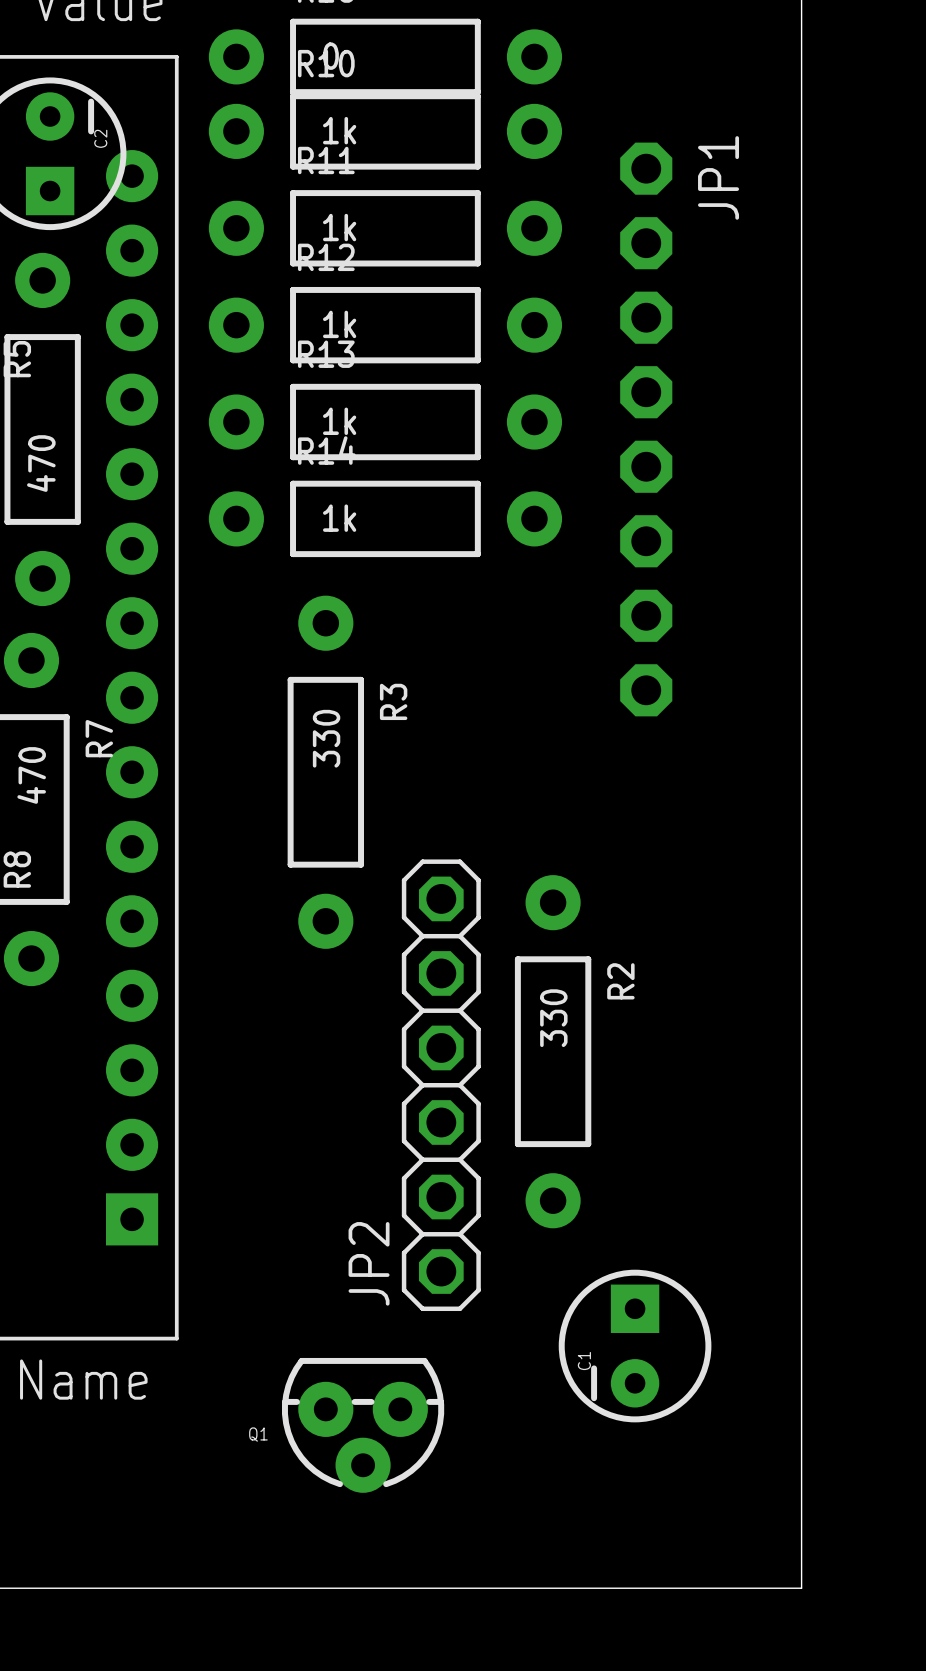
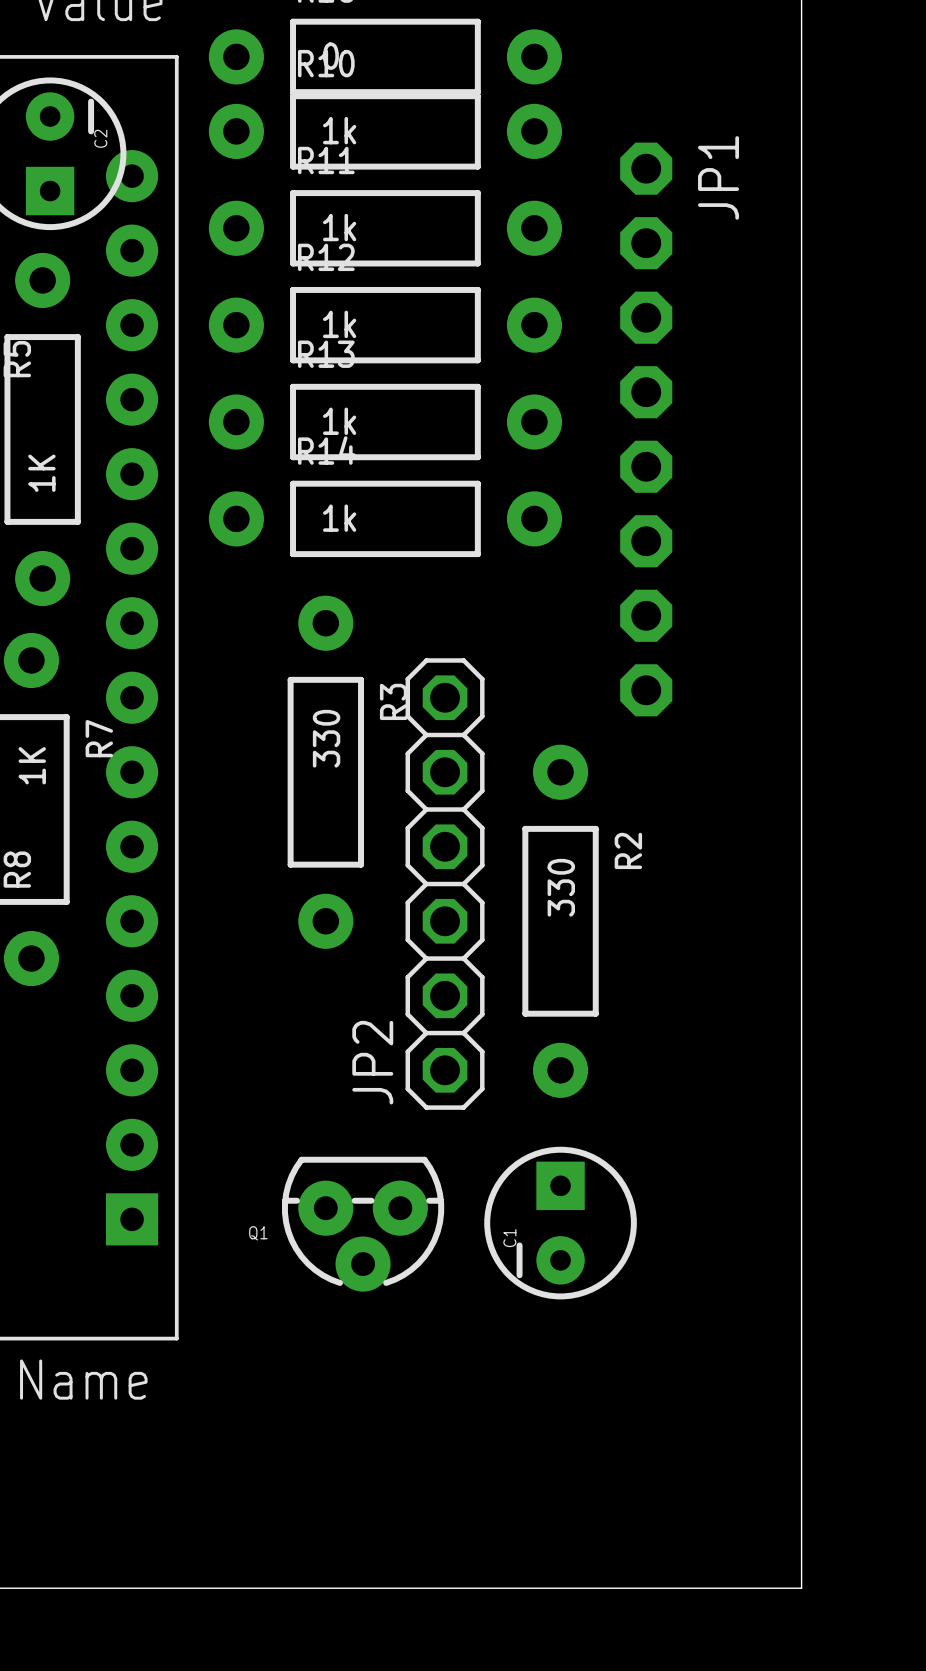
part value: 470 (41, 463) -> 1K (41, 473)
R7 value: 470 (31, 775) -> 1K (32, 765)
R2 position: (553, 1051) -> (560, 921)
JP2 position: (441, 1085) -> (445, 884)
C1 position: (635, 1346) -> (560, 1223)
Q1 position: (363, 1425) -> (363, 1224)

